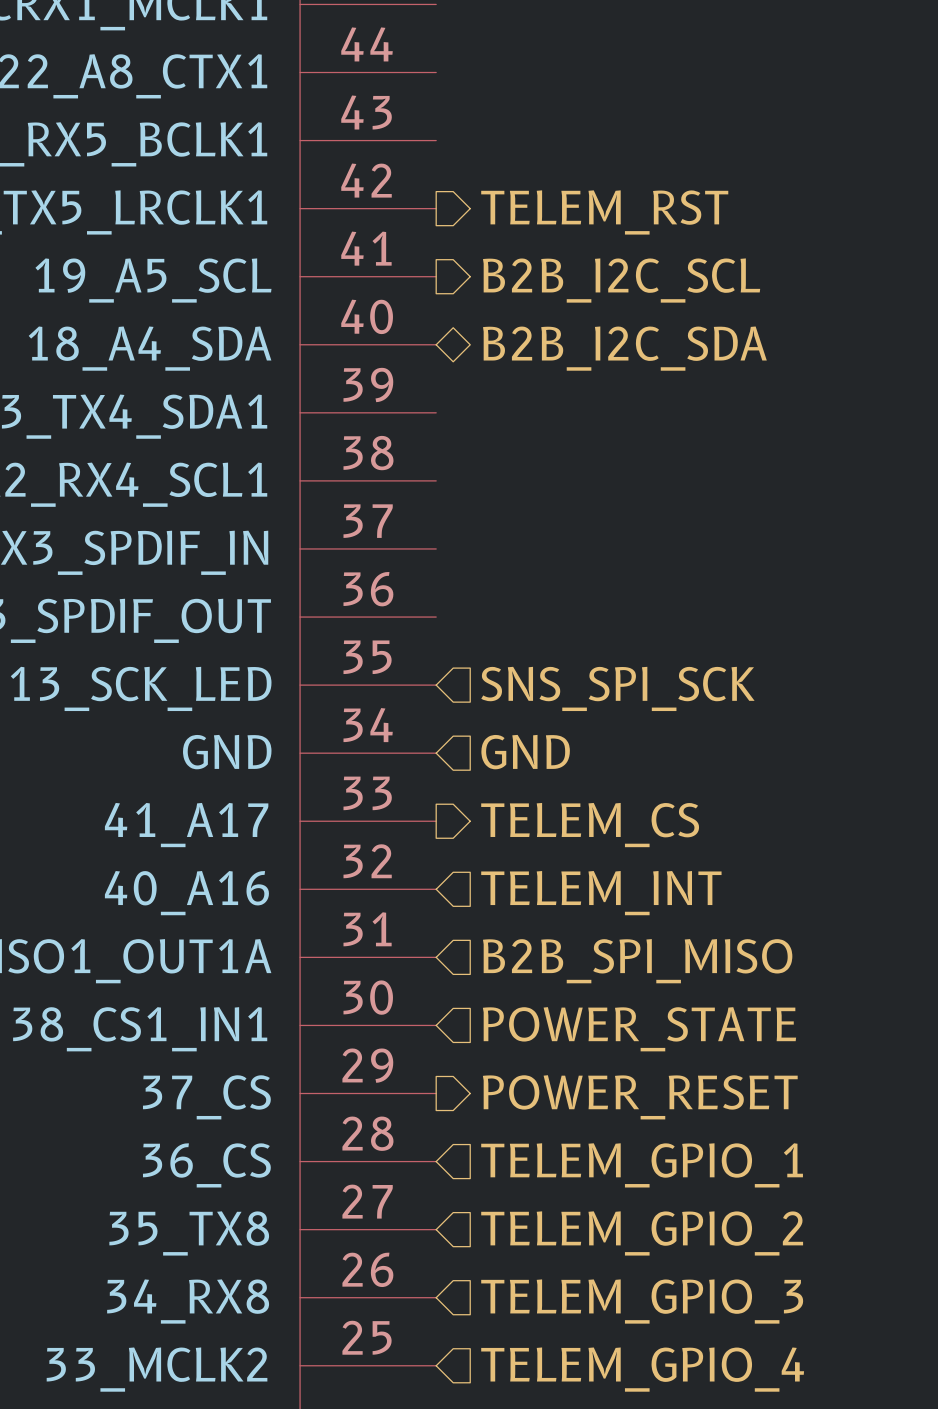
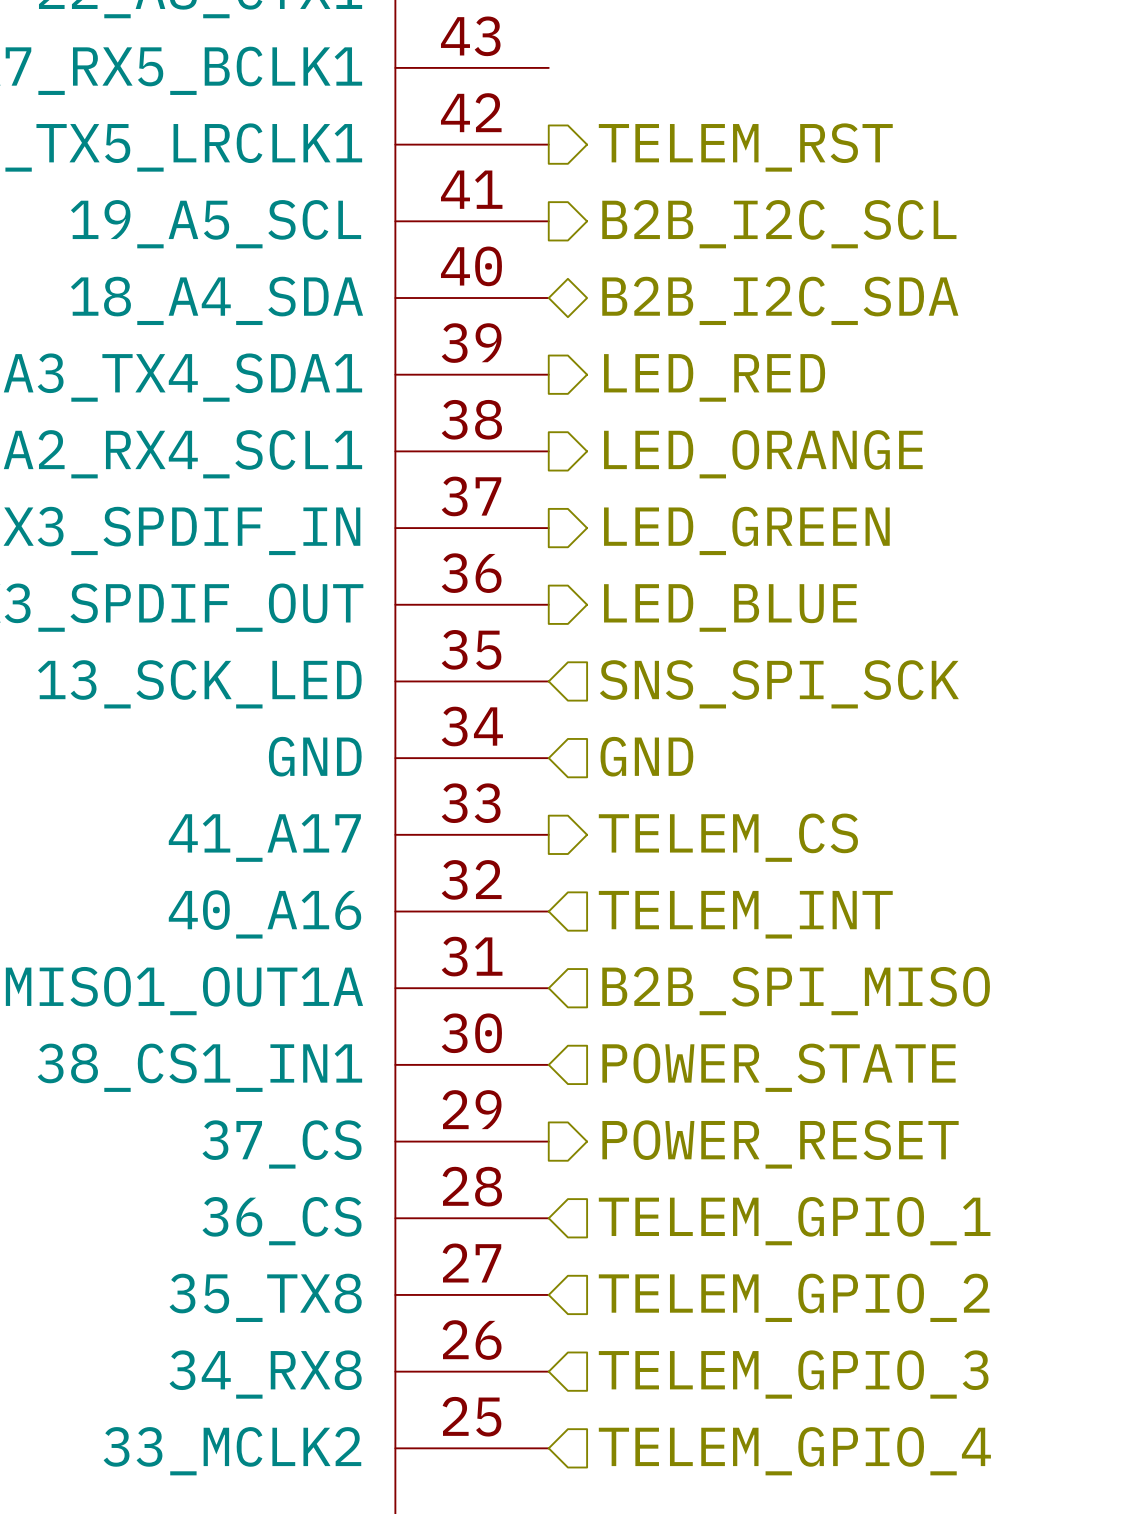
hierarchical label: none -> LED_RED (714, 377)
hierarchical label: none -> LED_ORANGE (763, 454)
hierarchical label: none -> LED_GREEN (746, 530)
hierarchical label: none -> LED_BLUE (730, 607)

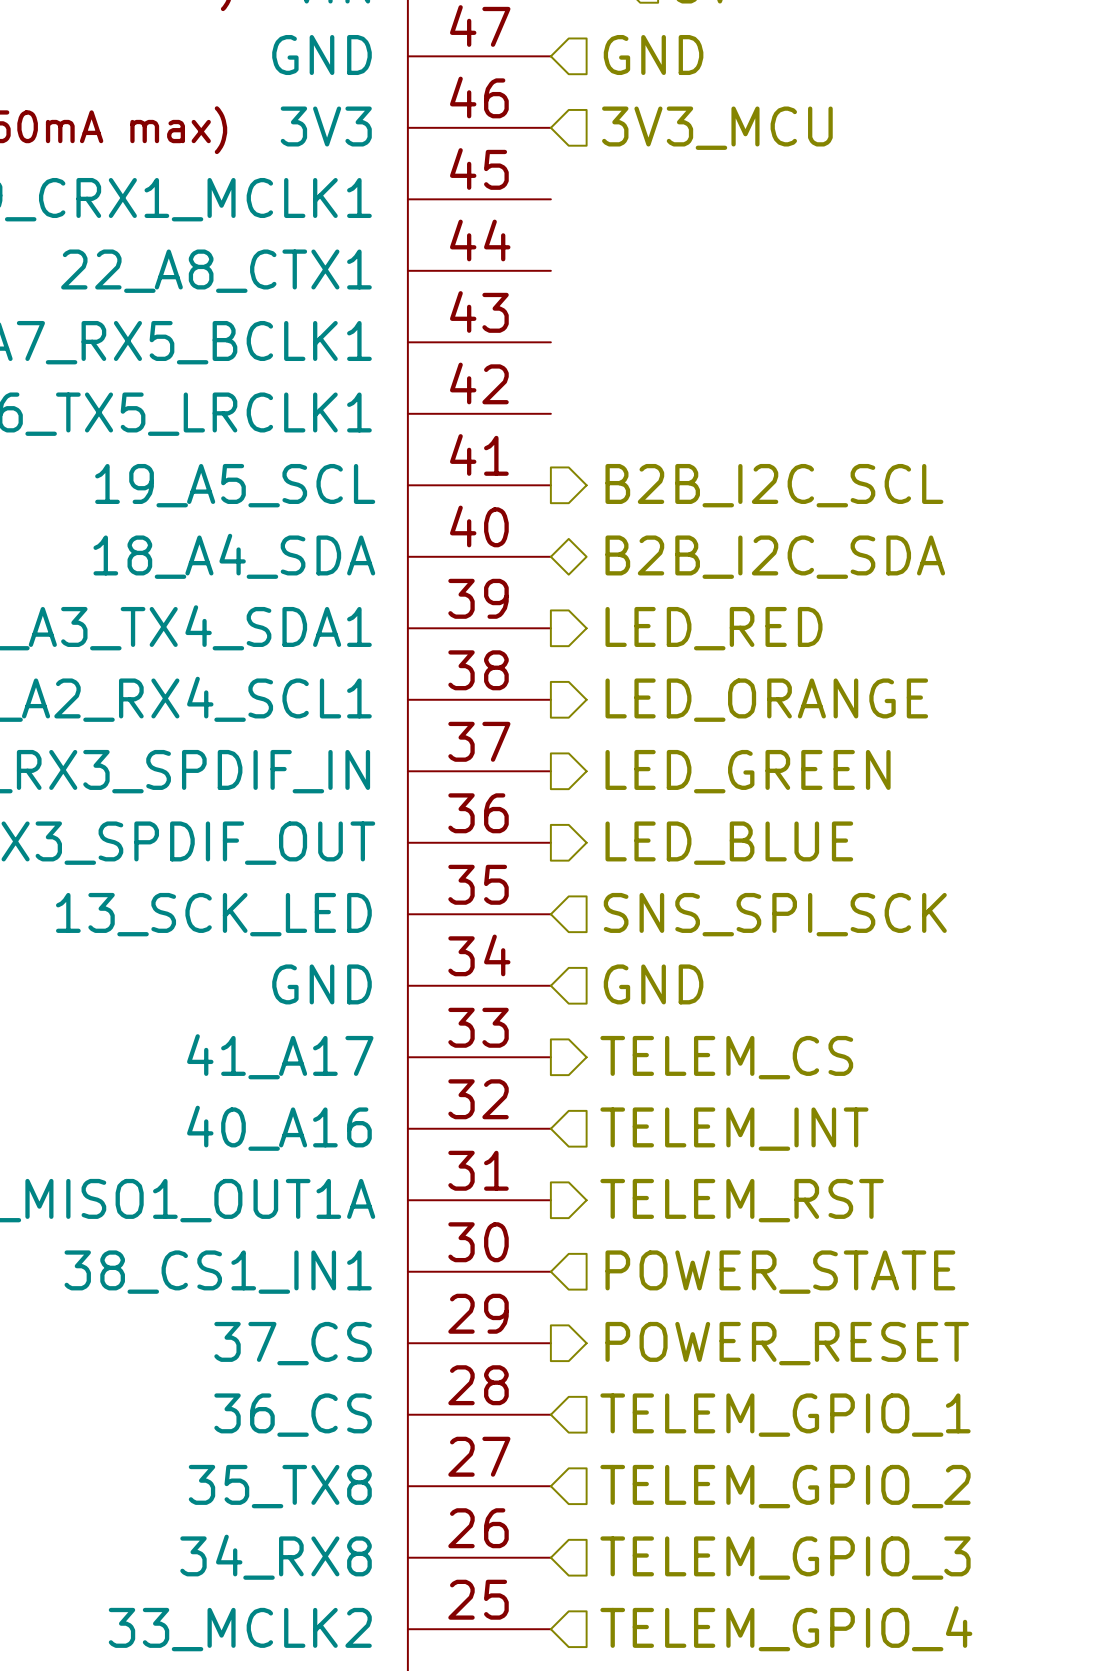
hierarchical label: TELEM_RST (745, 147) -> none
hierarchical label shape: input (796, 991) -> output (742, 1200)
hierarchical label: B2B_SPI_MISO (796, 991) -> TELEM_RST (742, 1200)

